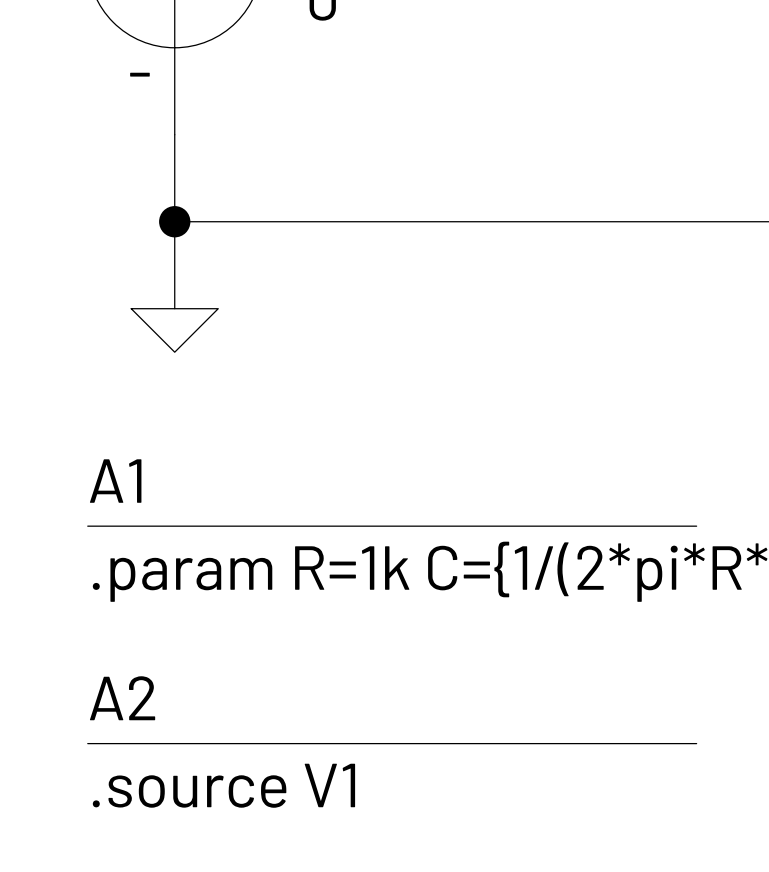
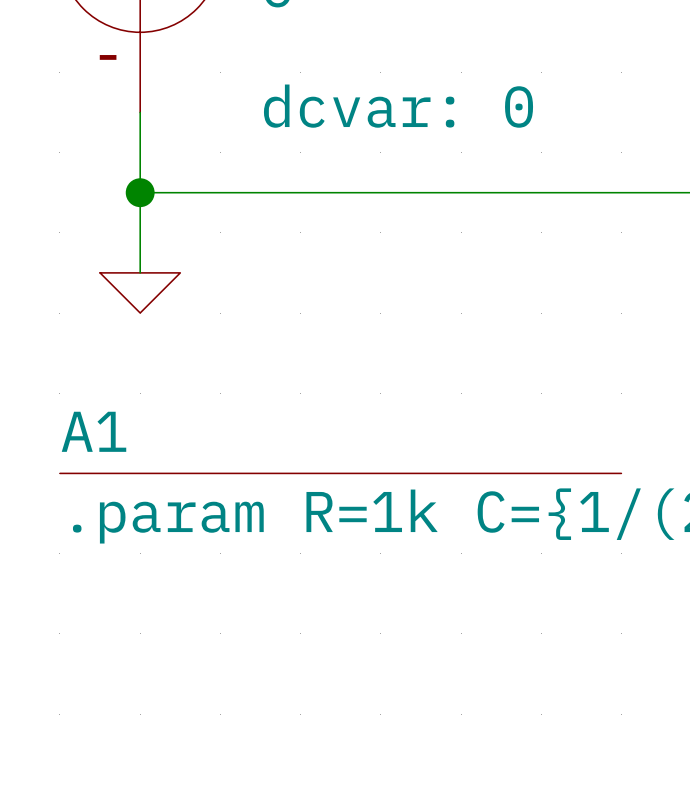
part text: none -> dcvar: 0 (398, 106)
A2: (392, 743) -> none

